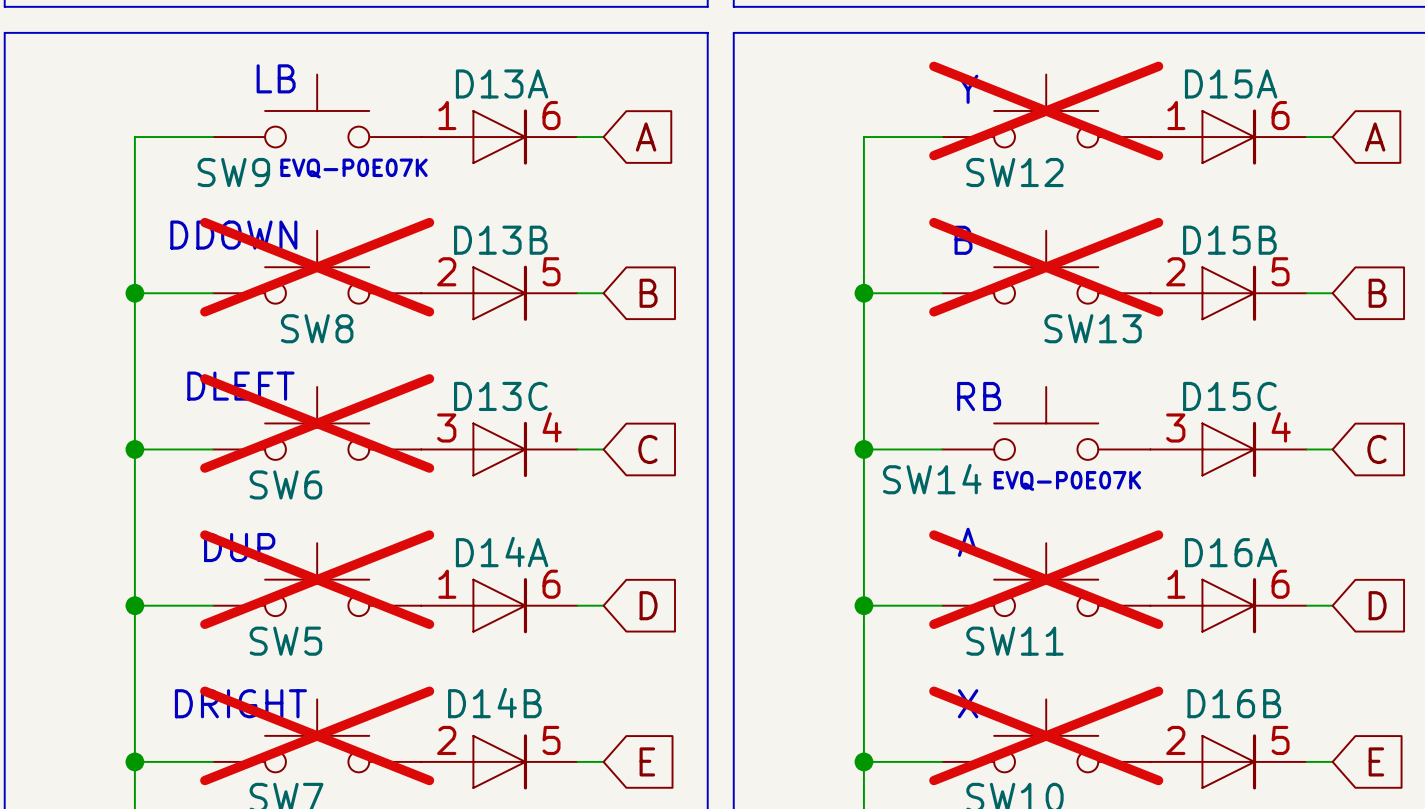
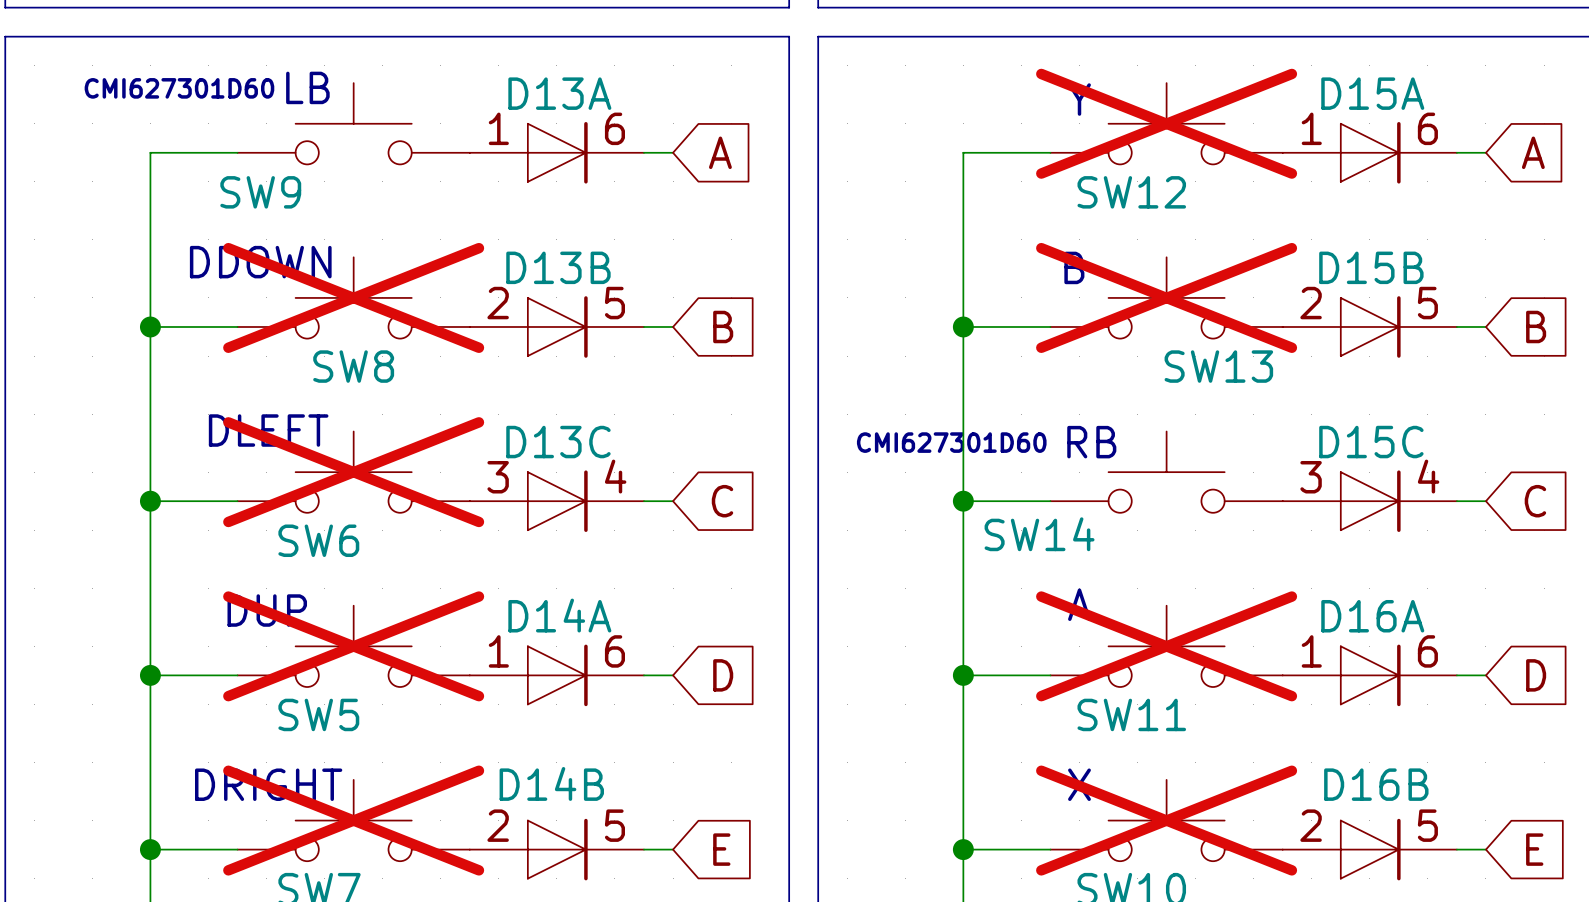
text: none -> CMI627301D60 (179, 88)
text: EVQ-P0E07K (353, 168) -> none
text: none -> CMI627301D60 (951, 442)
text: EVQ-P0E07K (1067, 480) -> none

